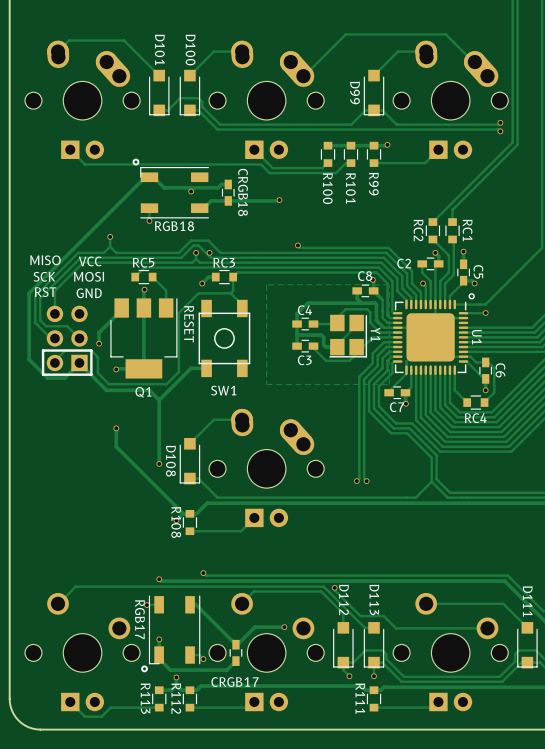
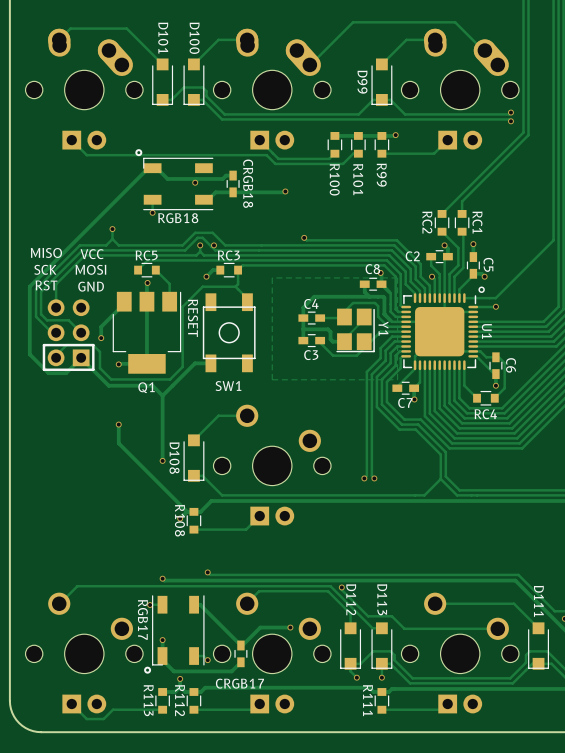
part footprint: [209, 408, 325, 528] -> [213, 404, 332, 526]

